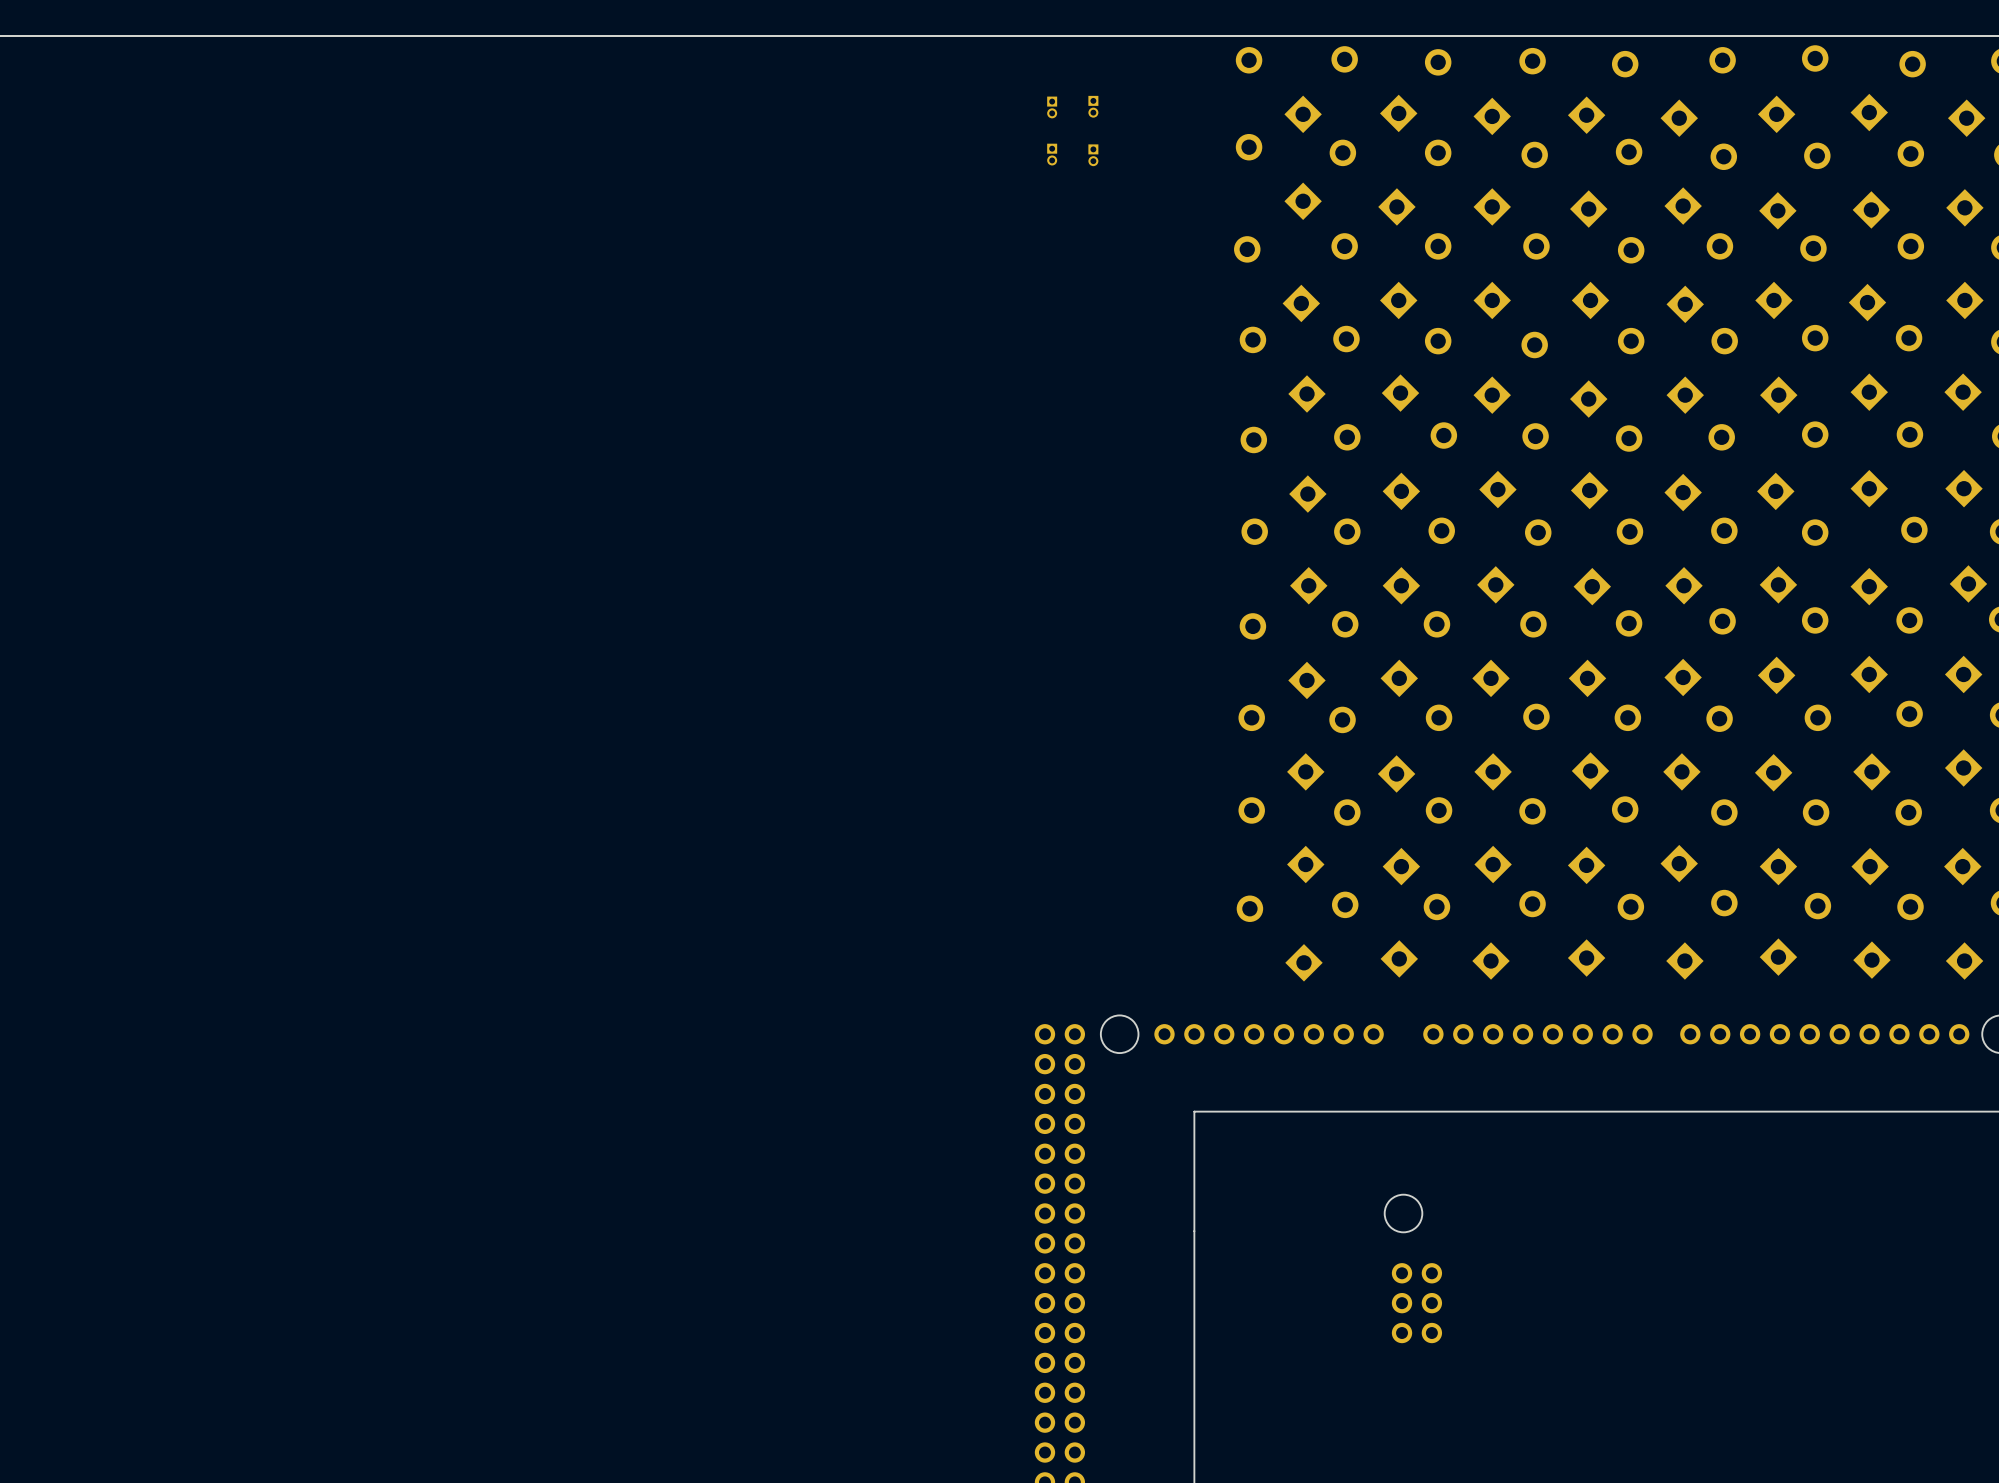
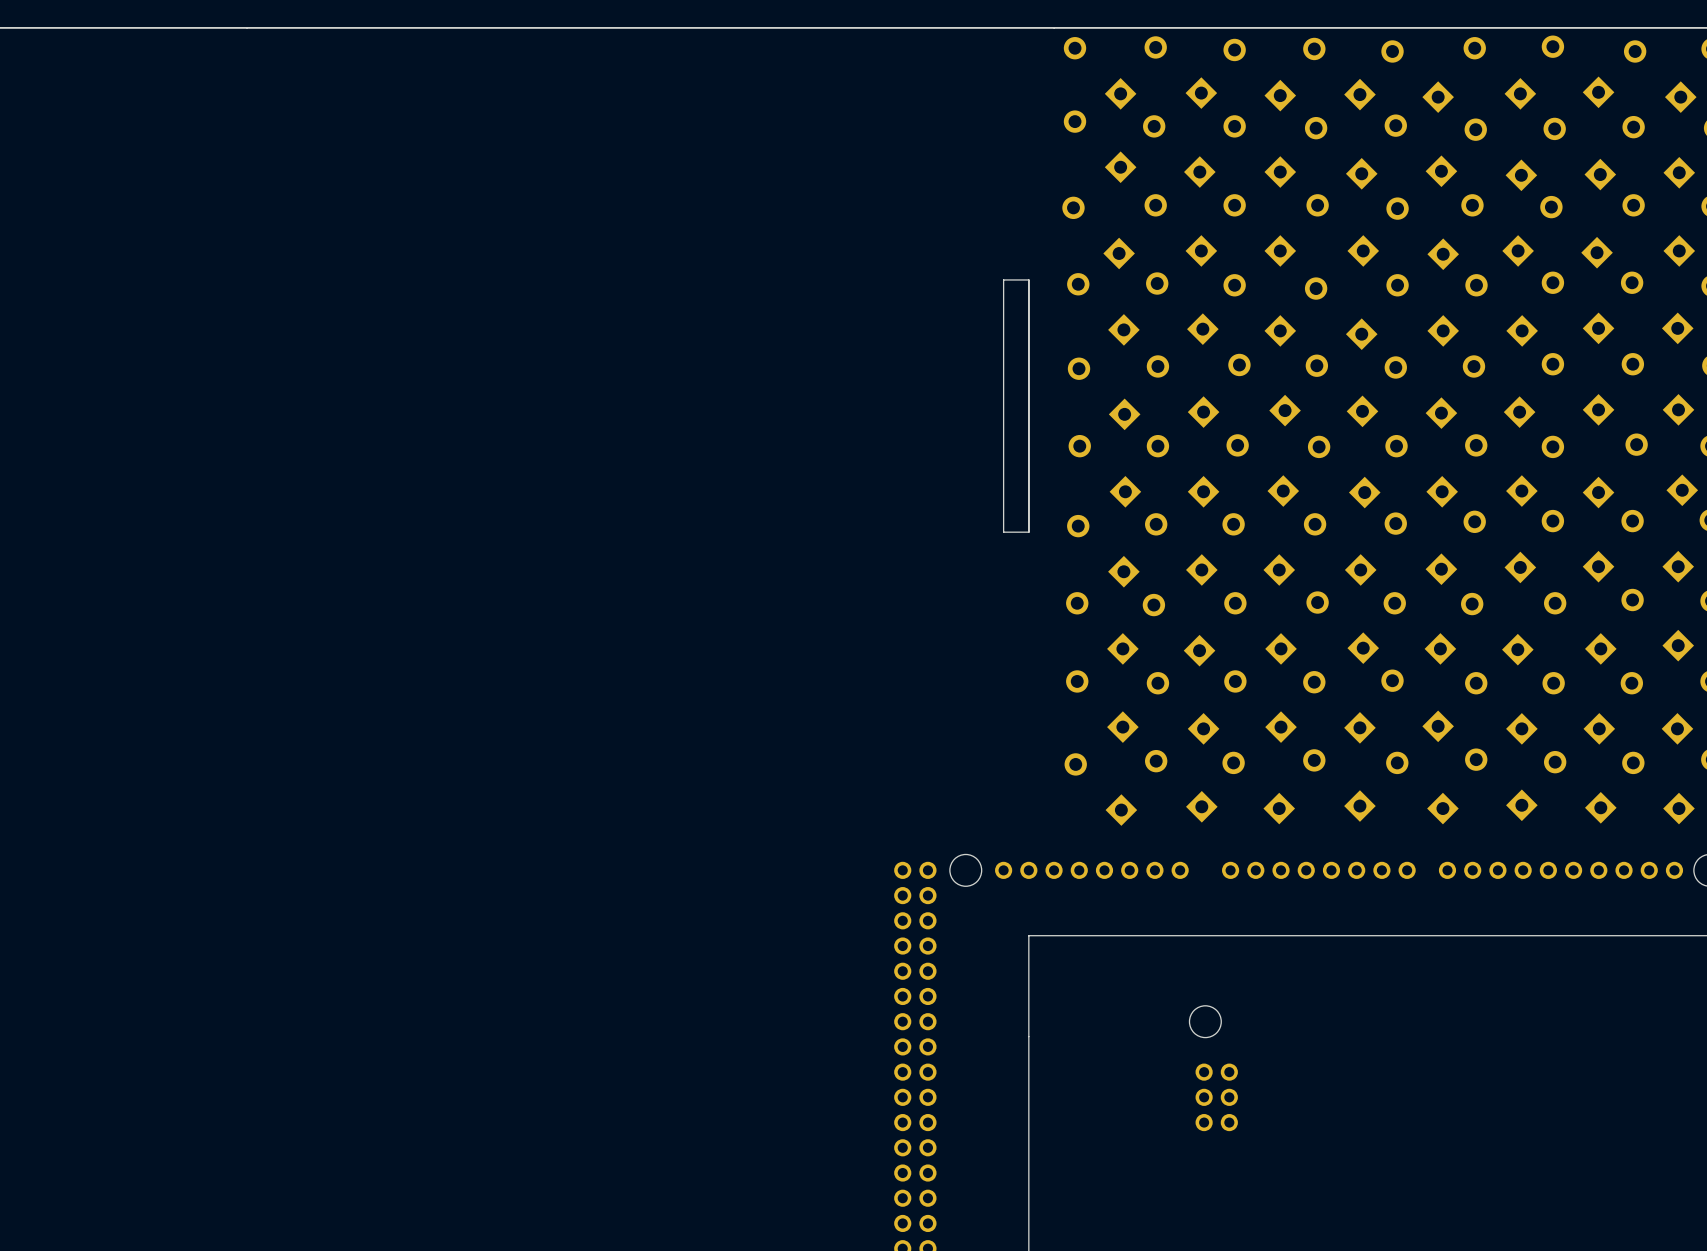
part: (1093, 106) -> none
part: (1052, 107) -> none
part: (1052, 154) -> none
part: (1093, 155) -> none
board edge: none -> (1028, 279) (1003, 279) (1003, 532) (1028, 532) (1028, 279)

